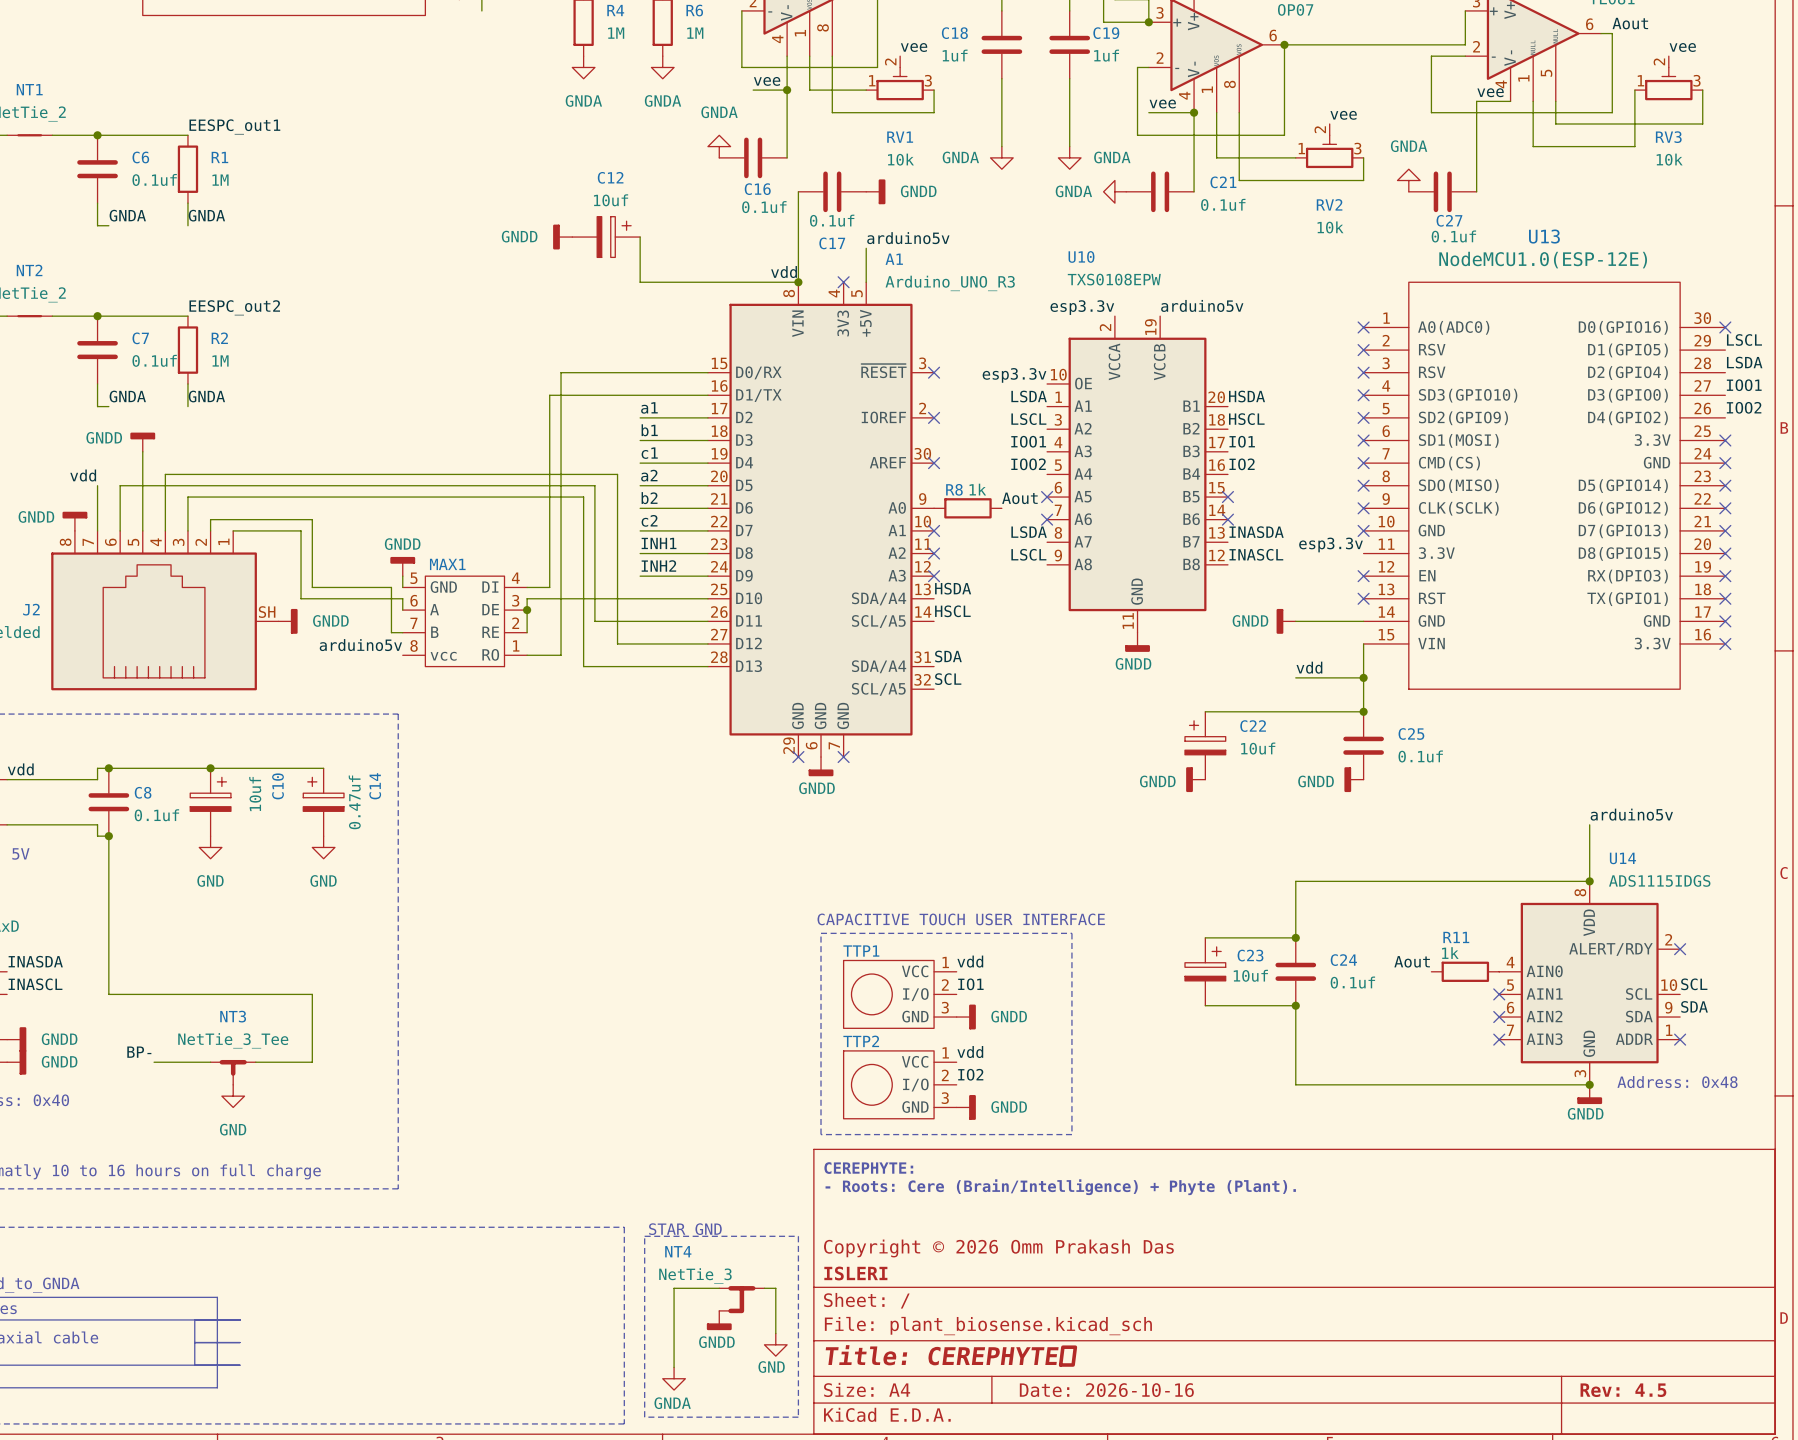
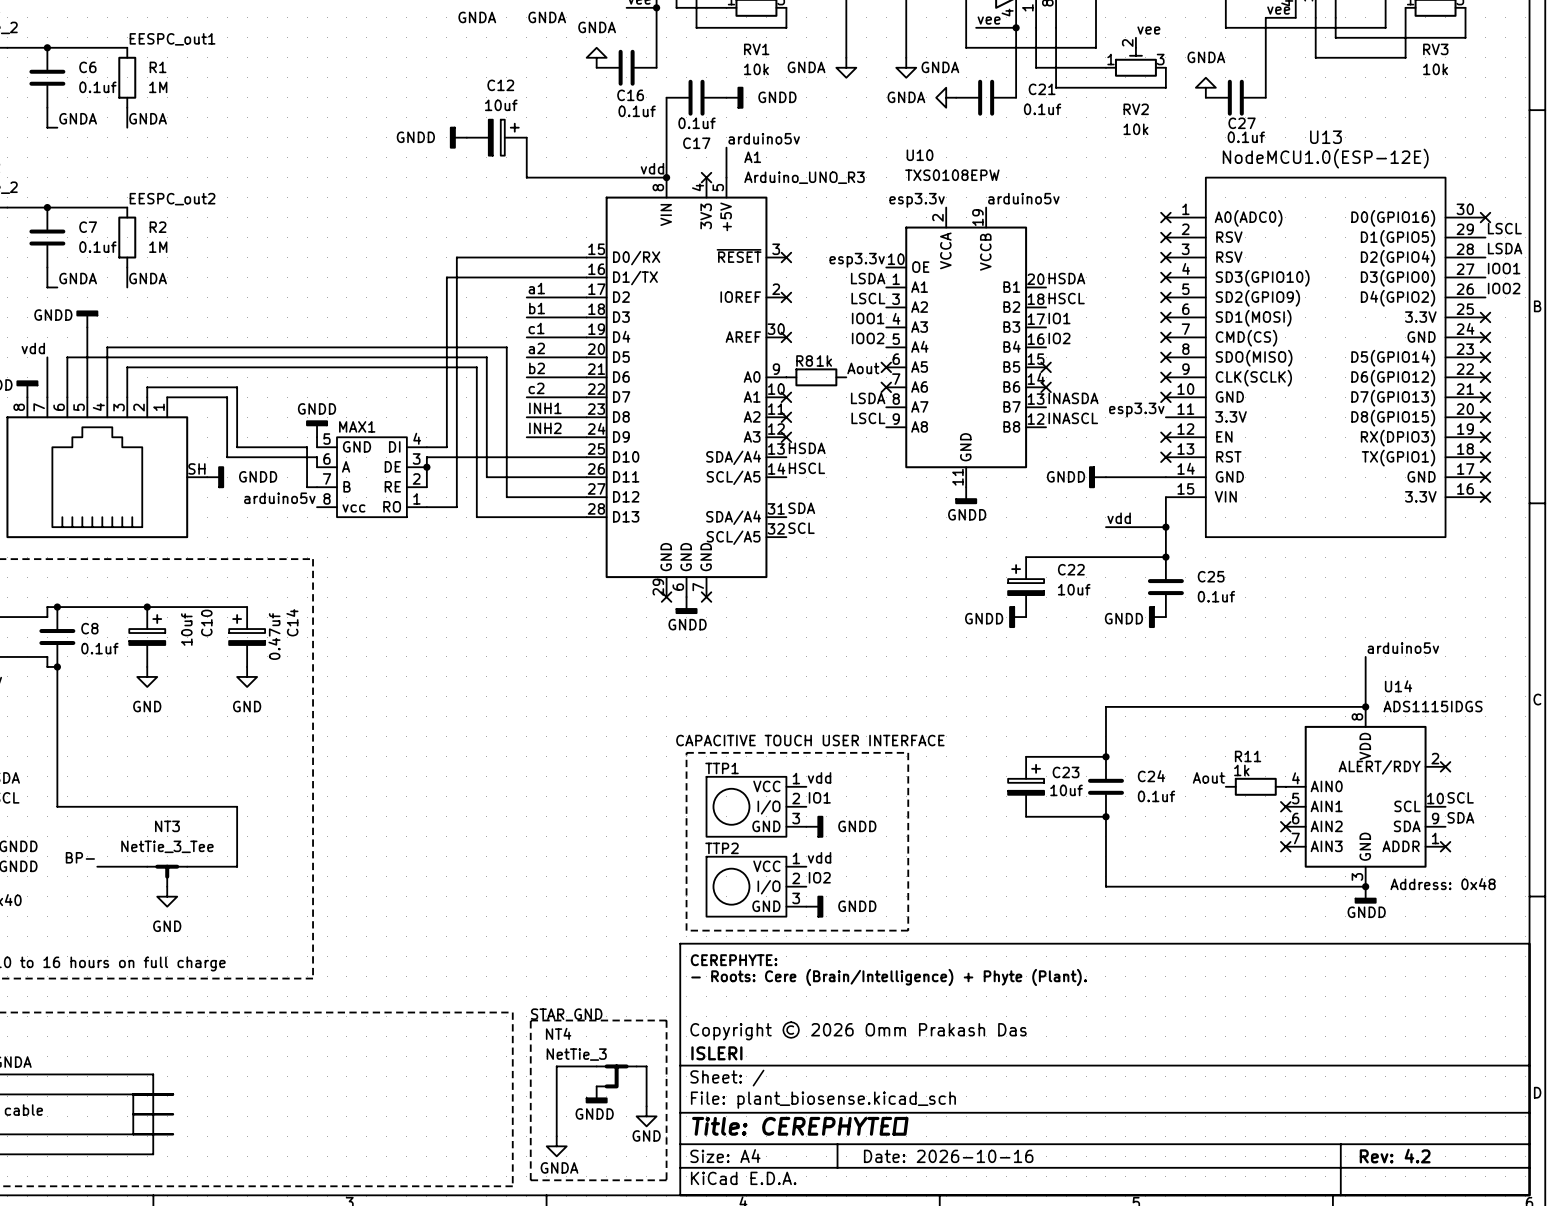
title block: Rev: 4.5 (1623, 1390) -> Rev: 4.2 (1395, 1156)

